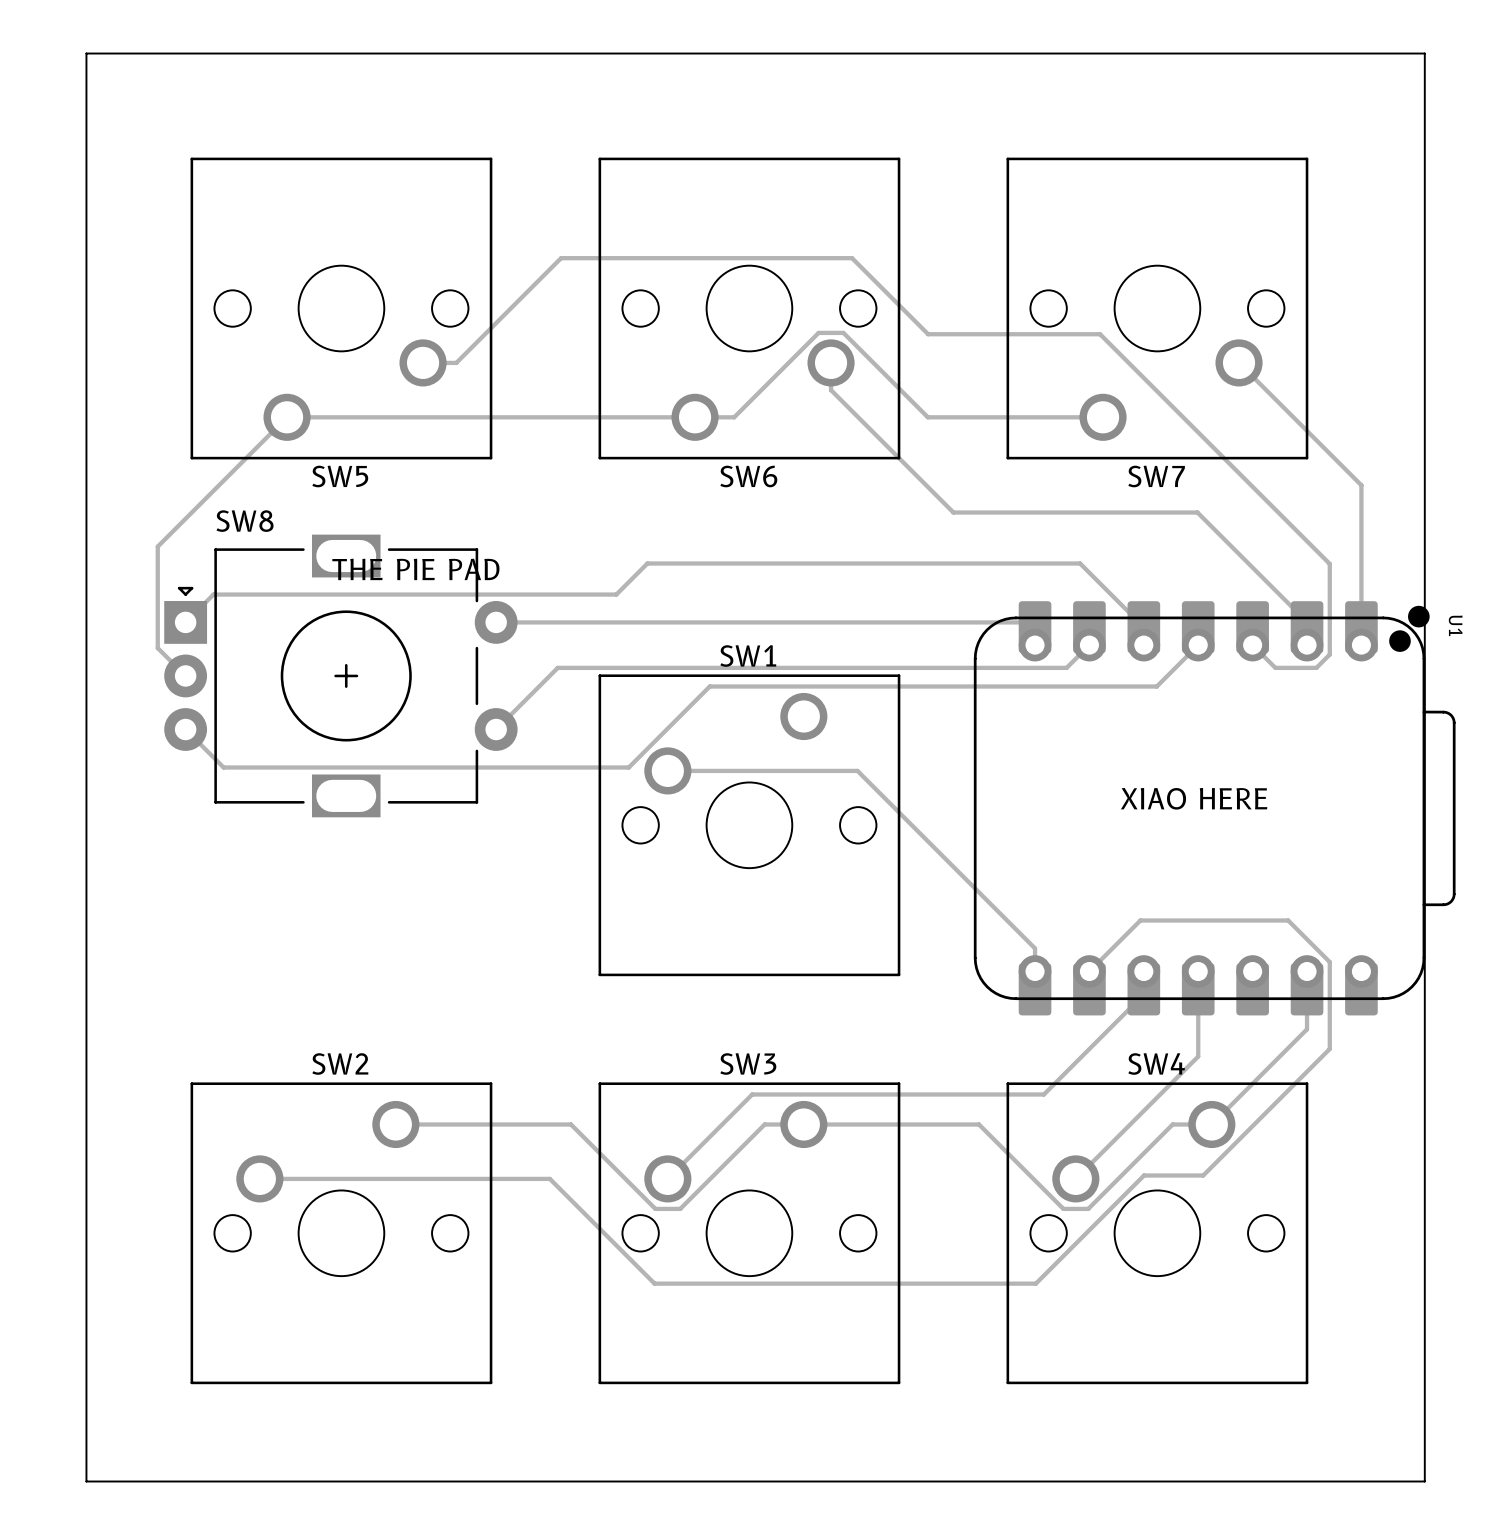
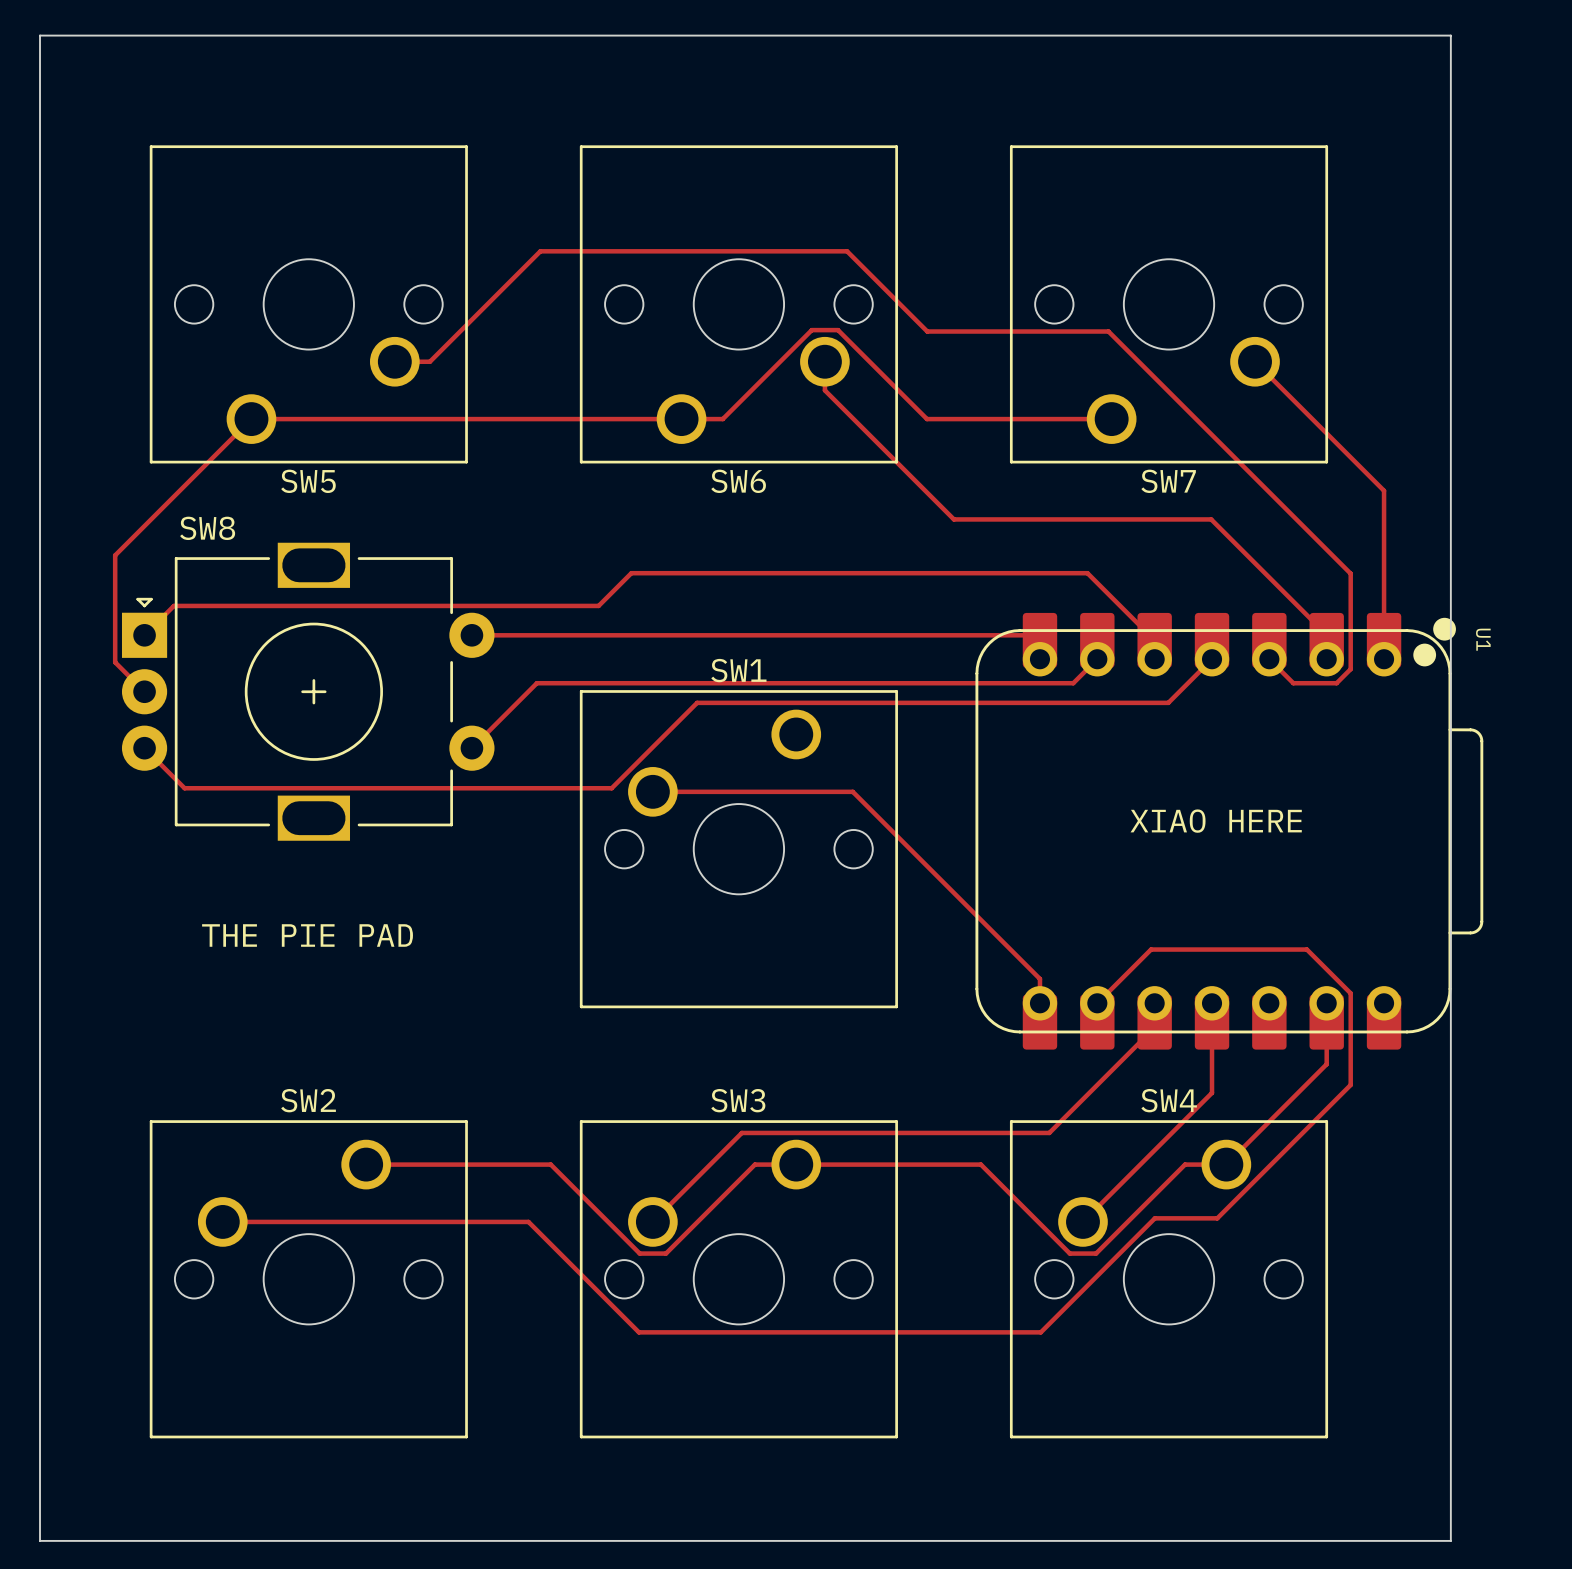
text position: THE PIE PAD (415, 569) -> THE PIE PAD (307, 935)

